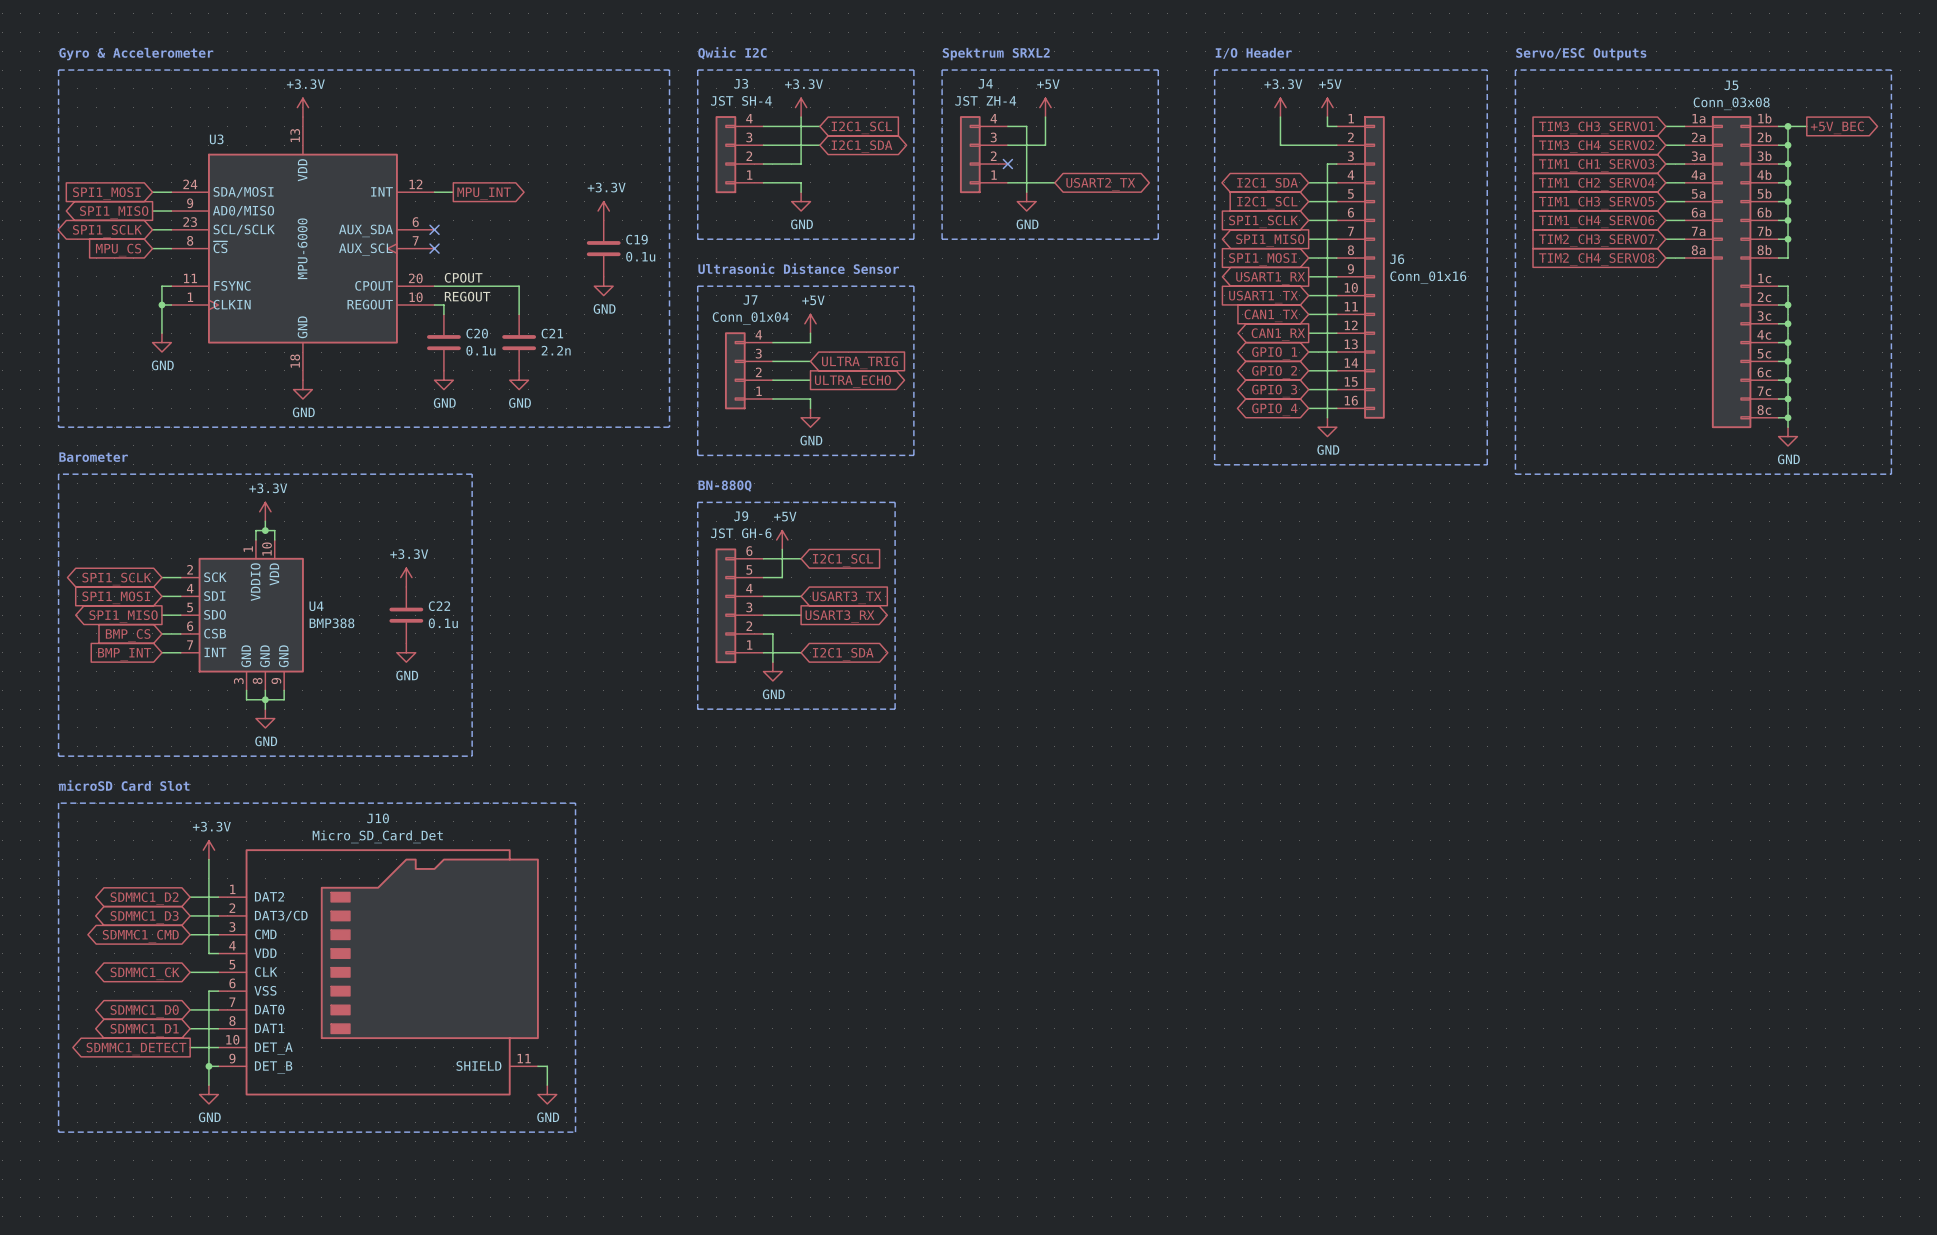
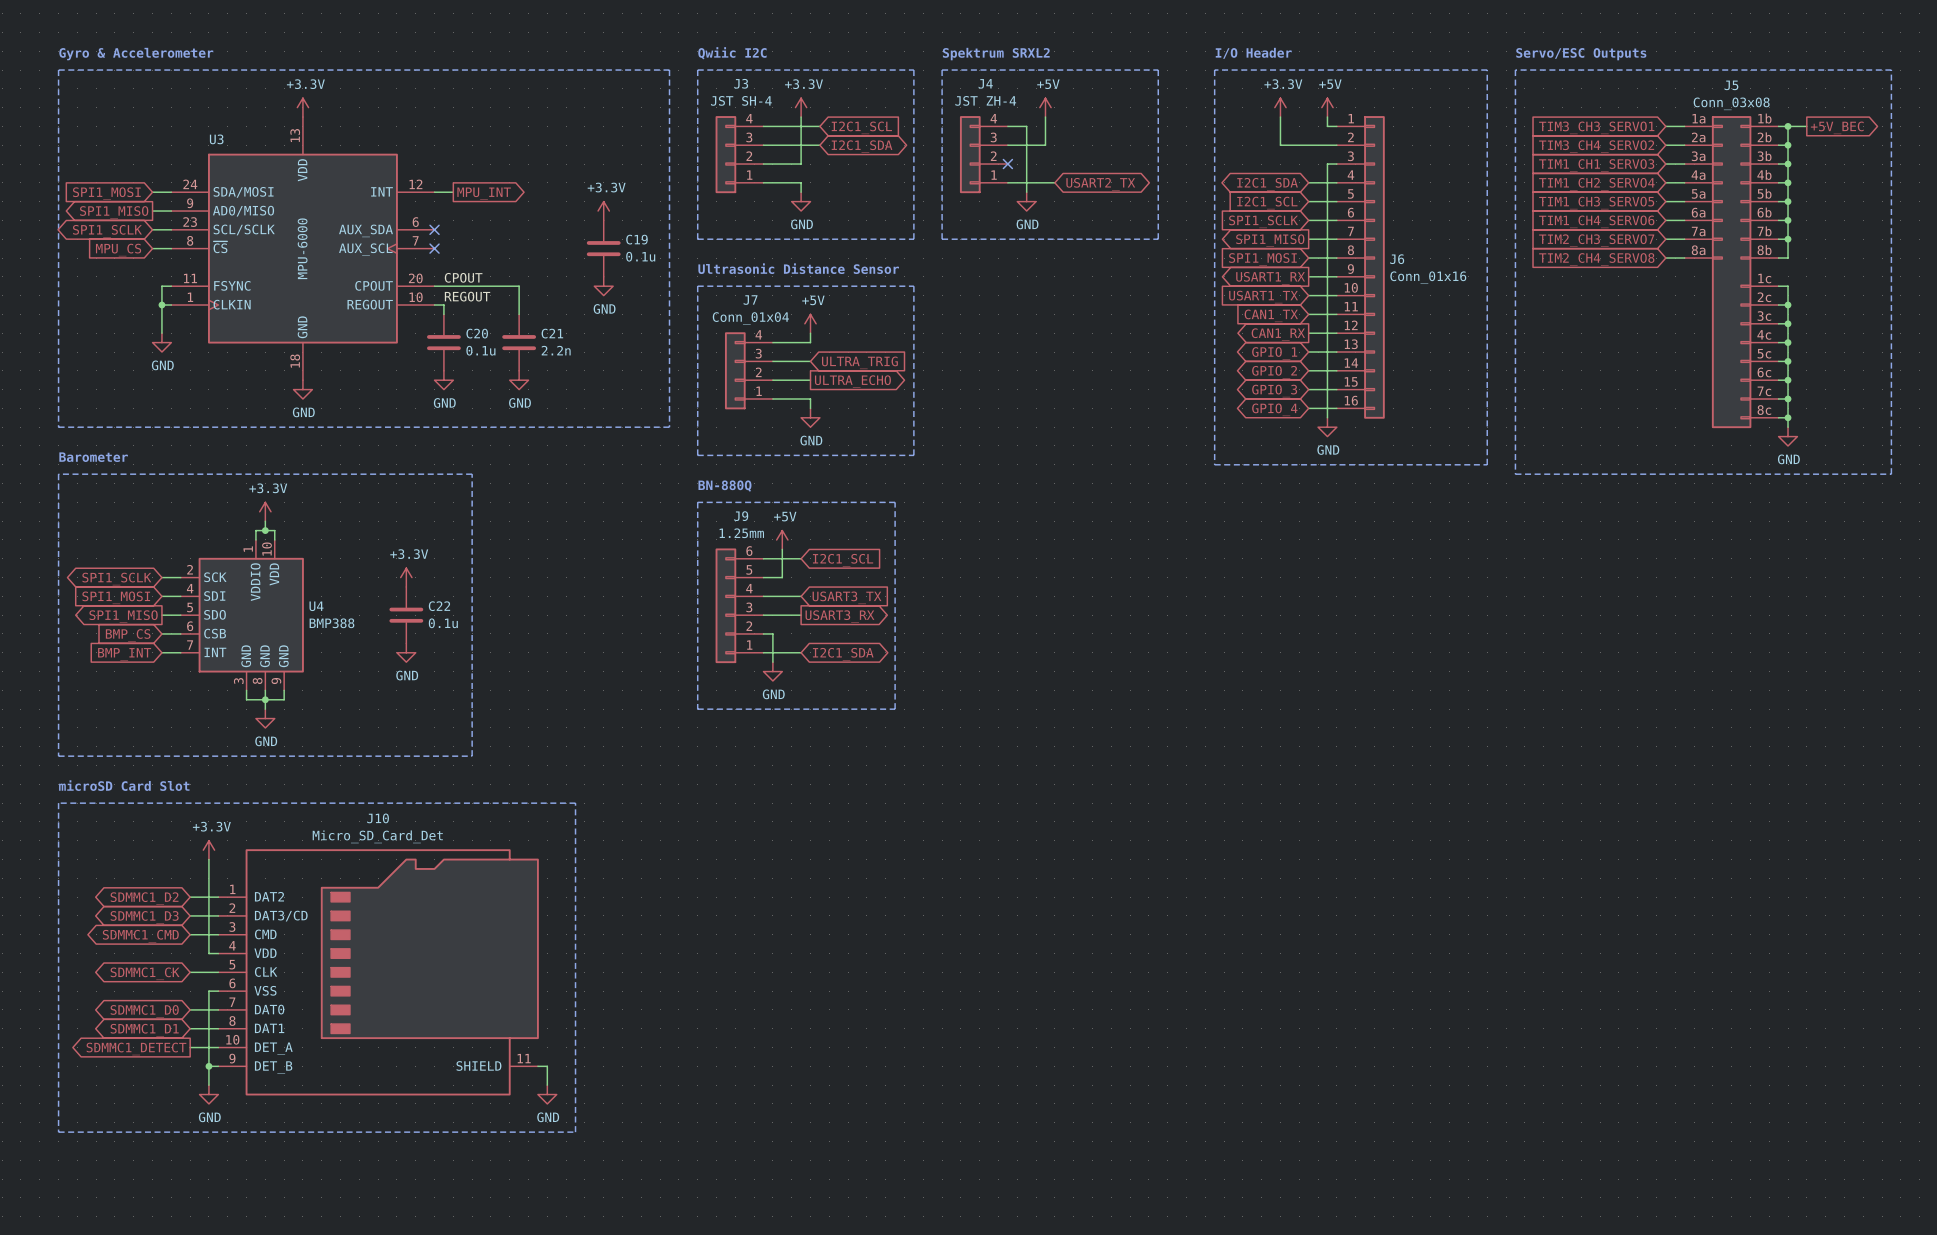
J9 value: JST GH-6 (741, 533) -> 1.25mm (741, 533)

